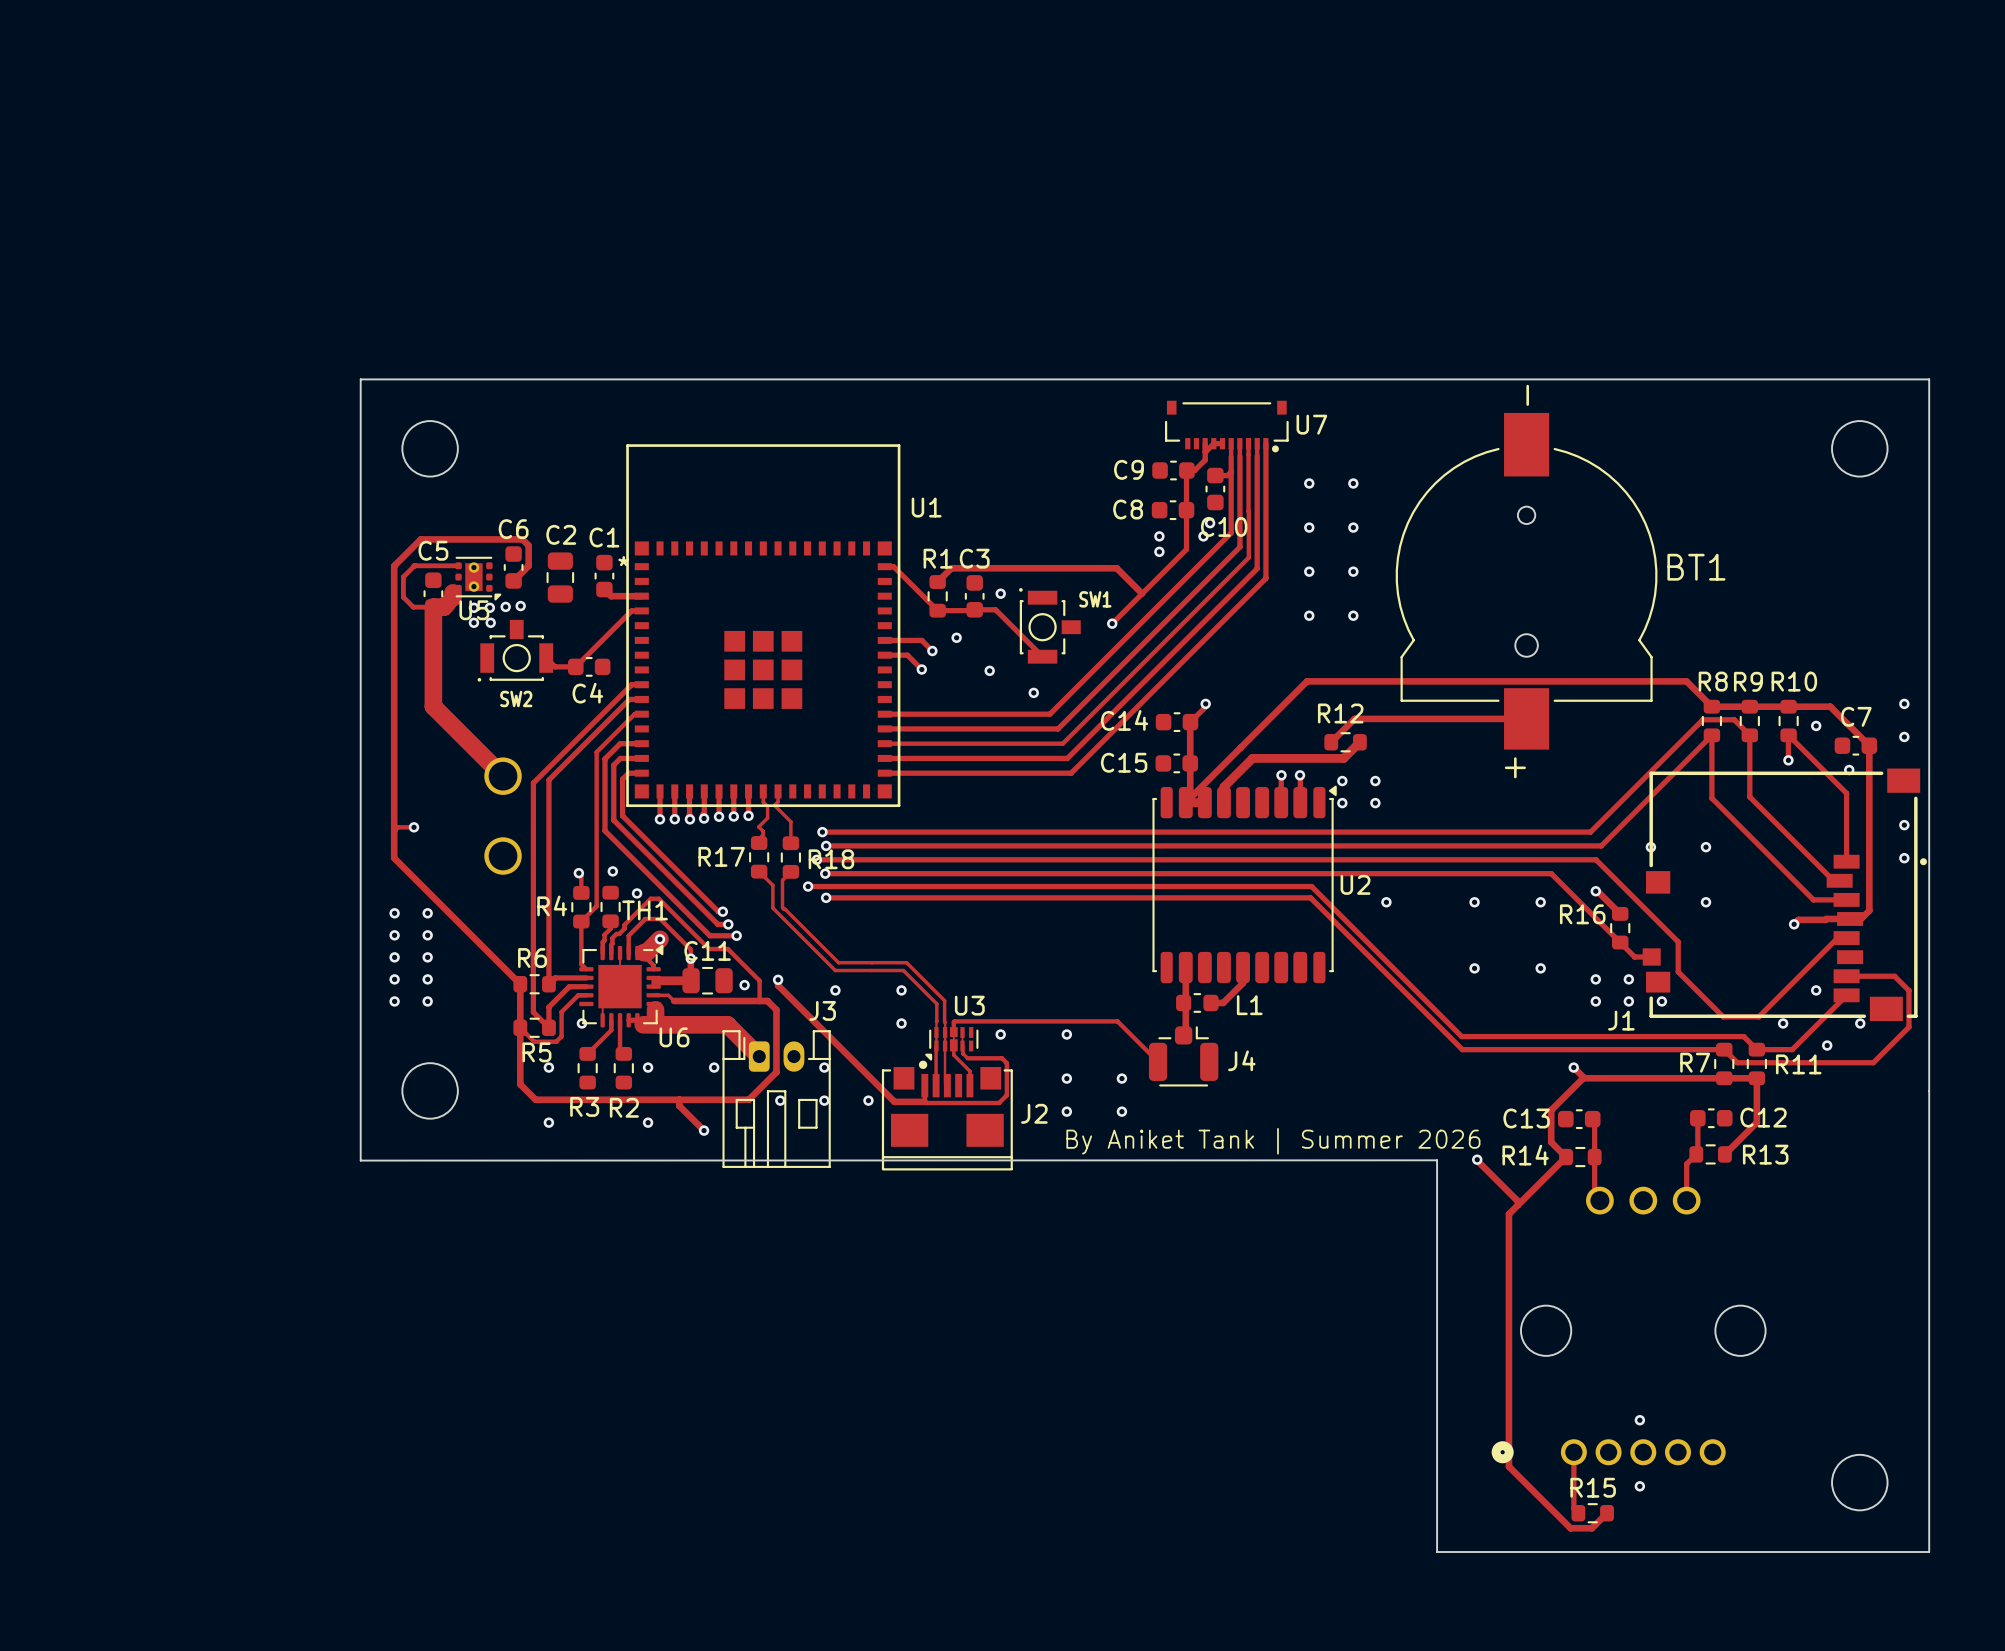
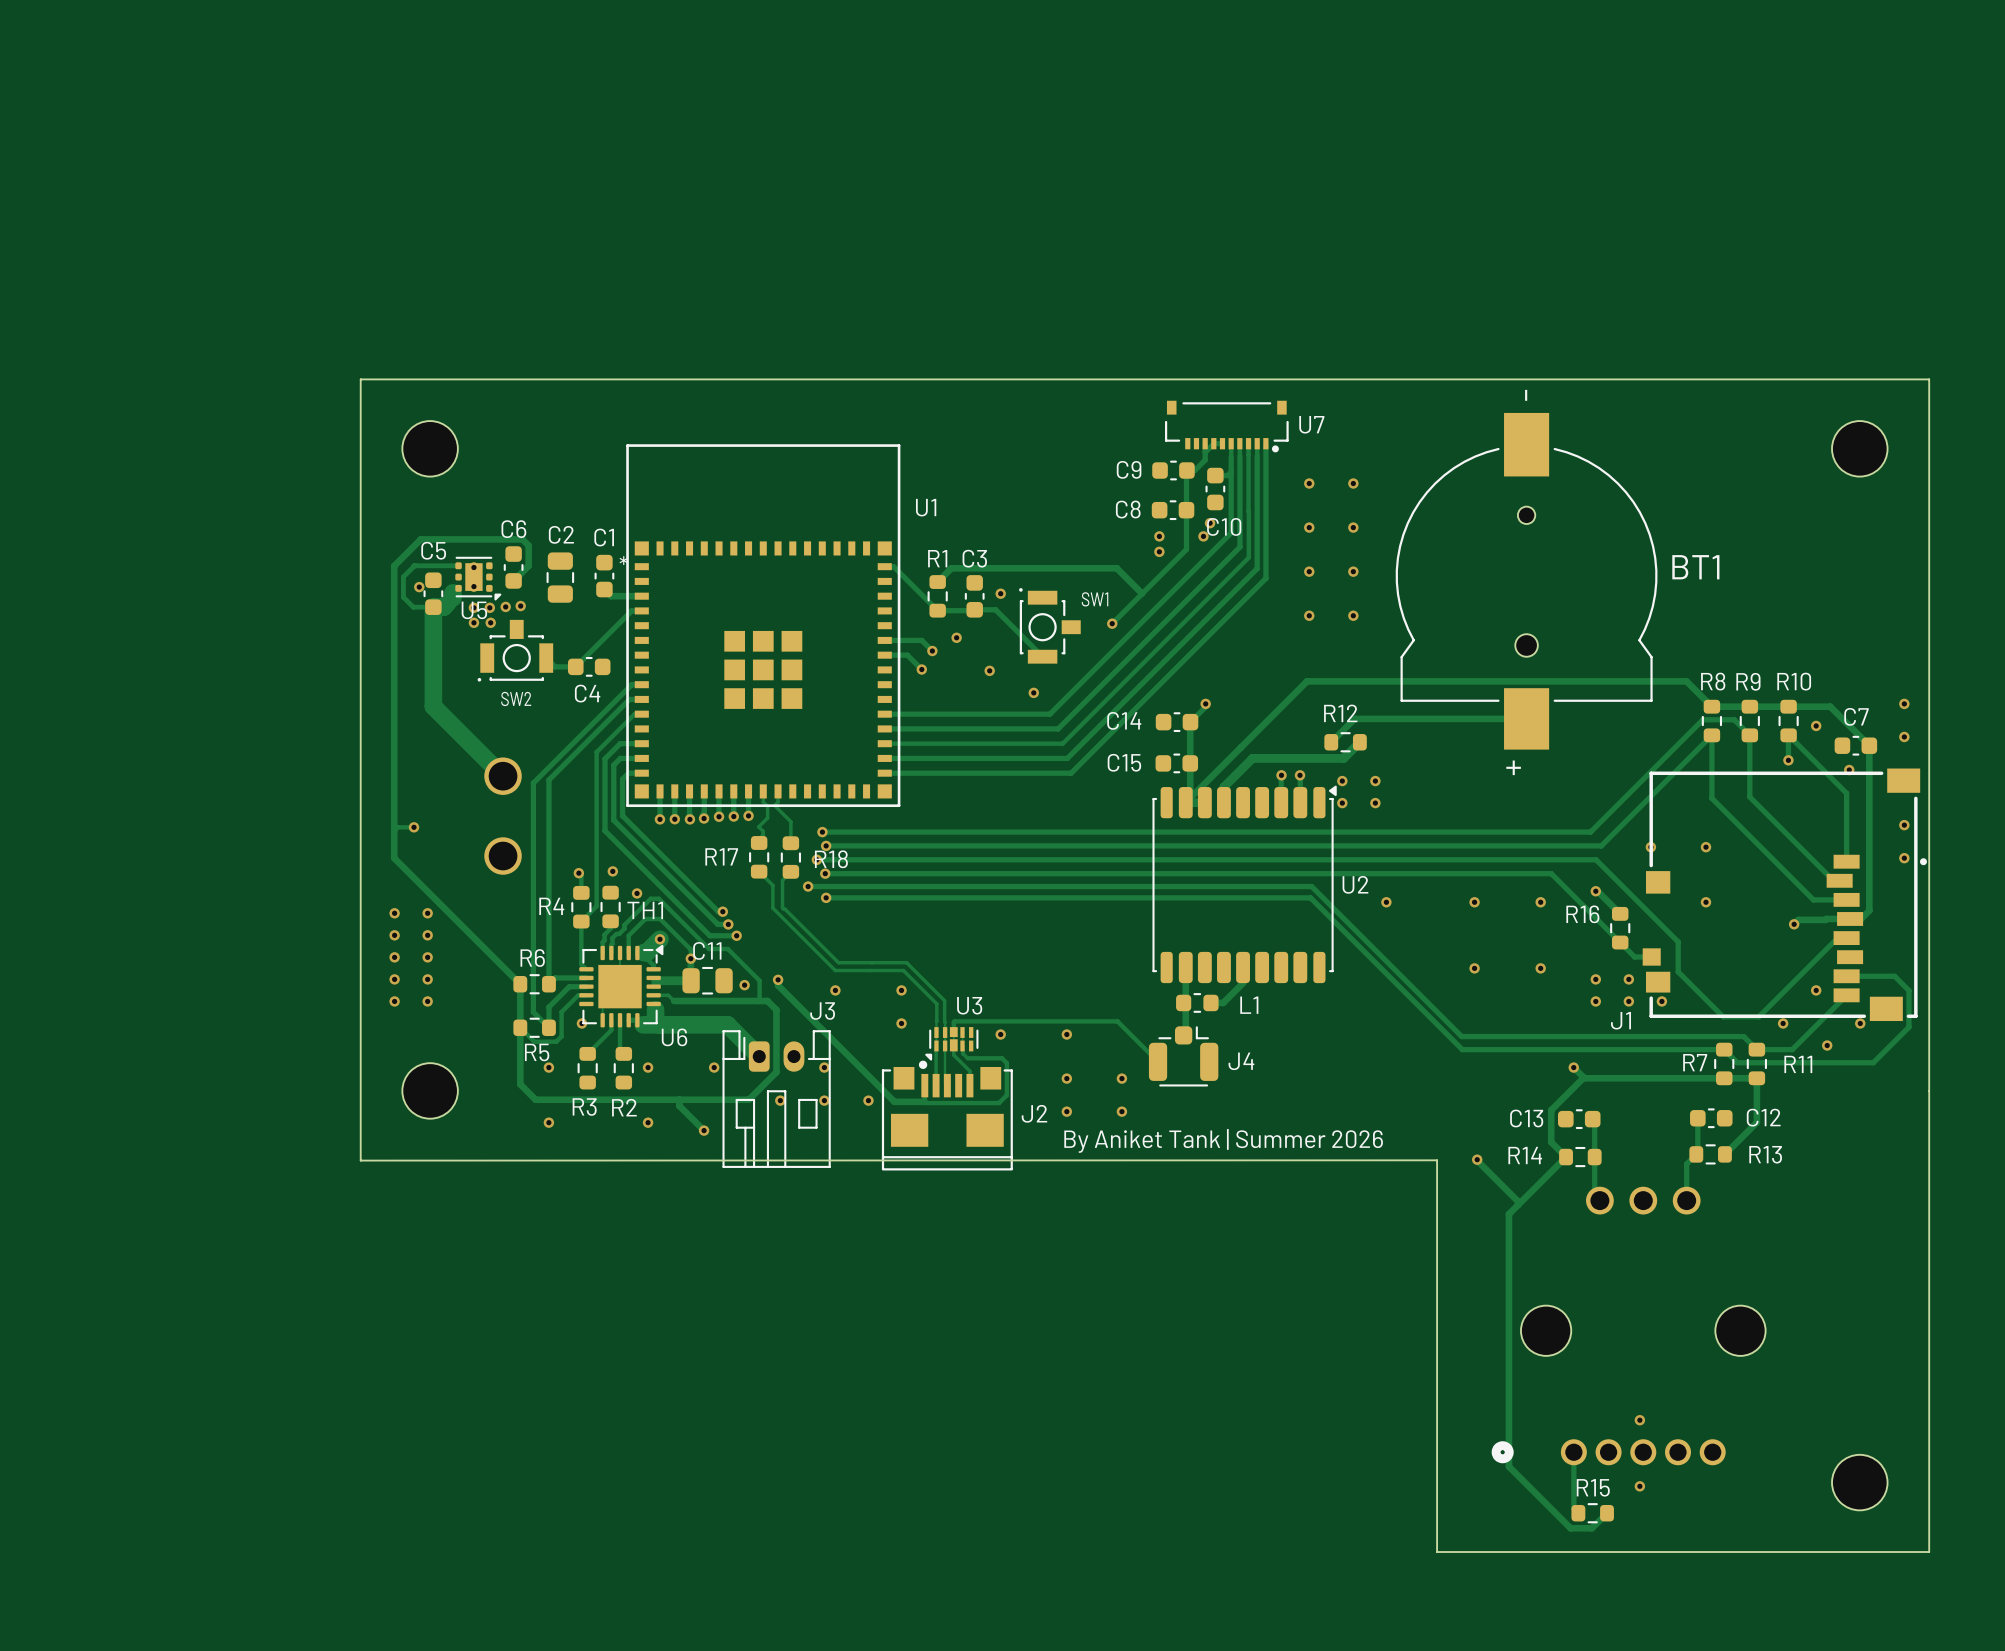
via: none -> (419, 587)

